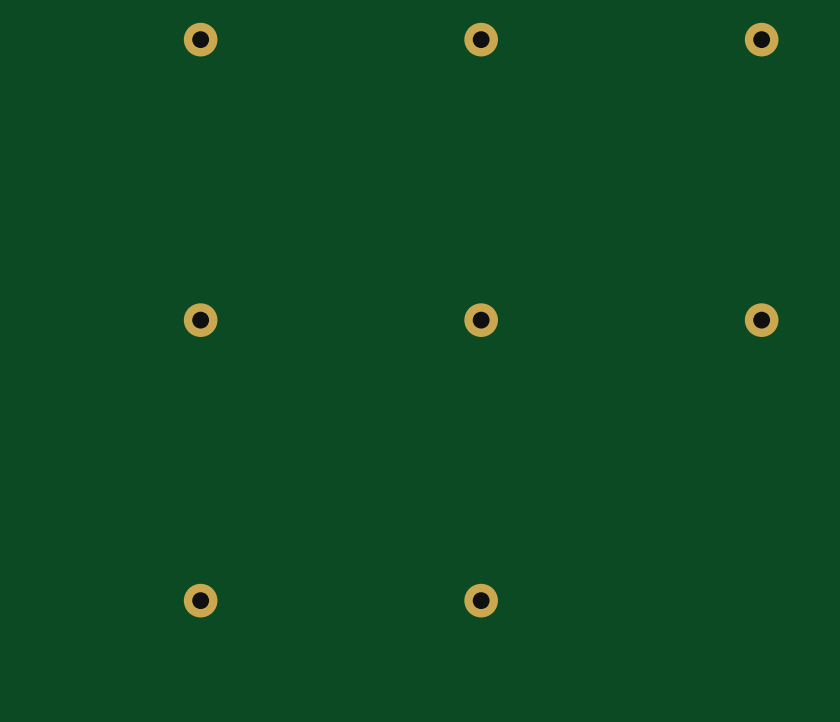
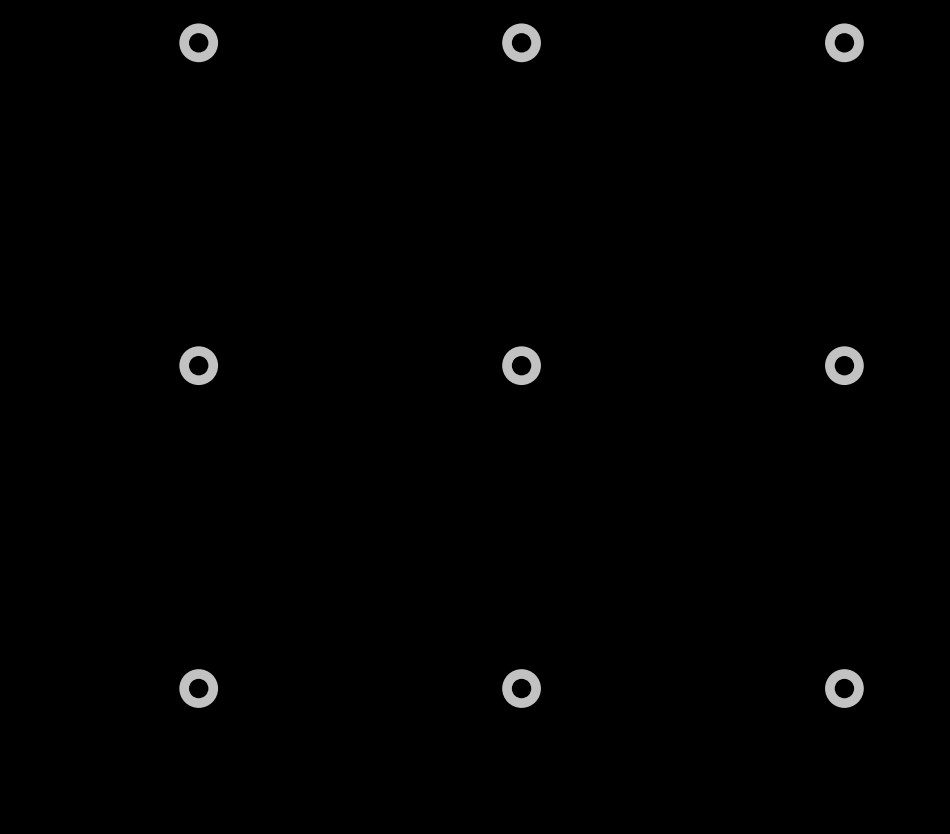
via: none -> (844, 688)

